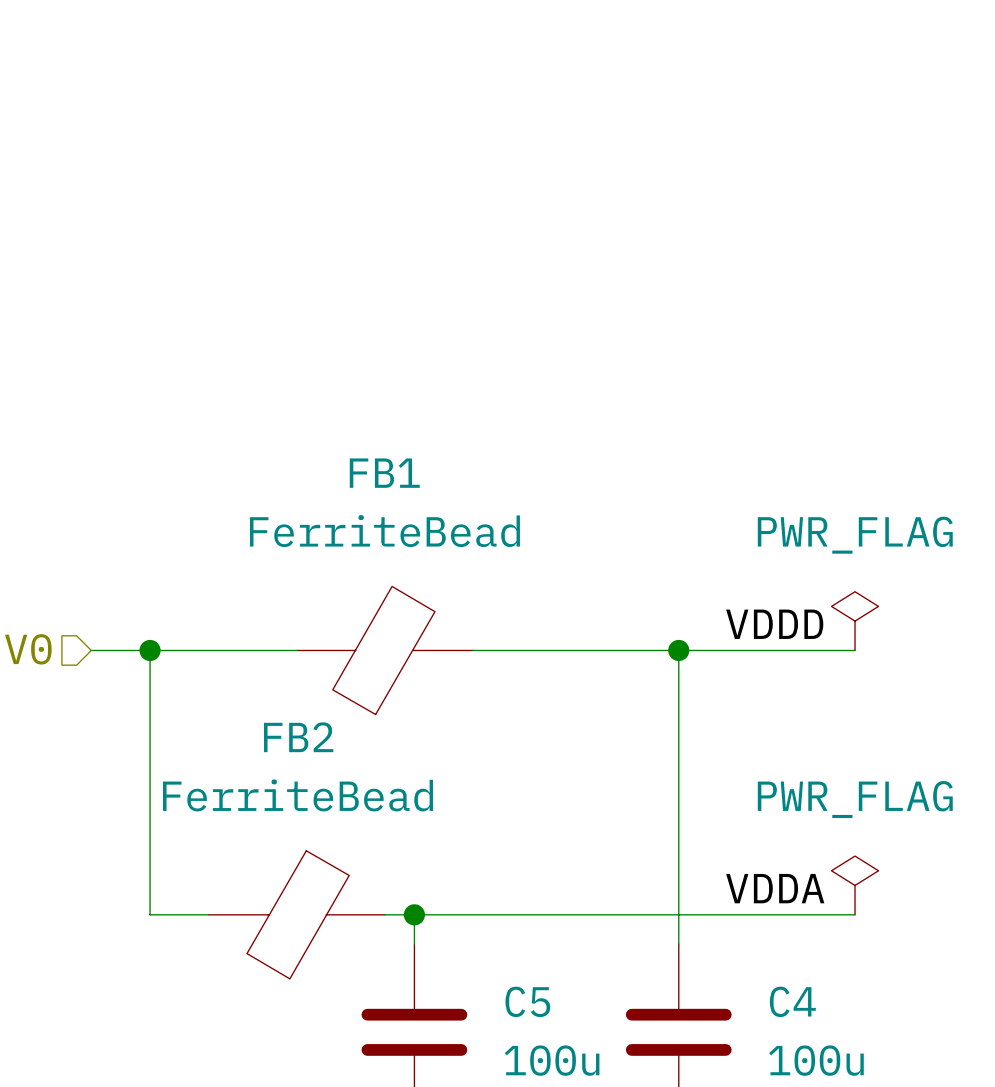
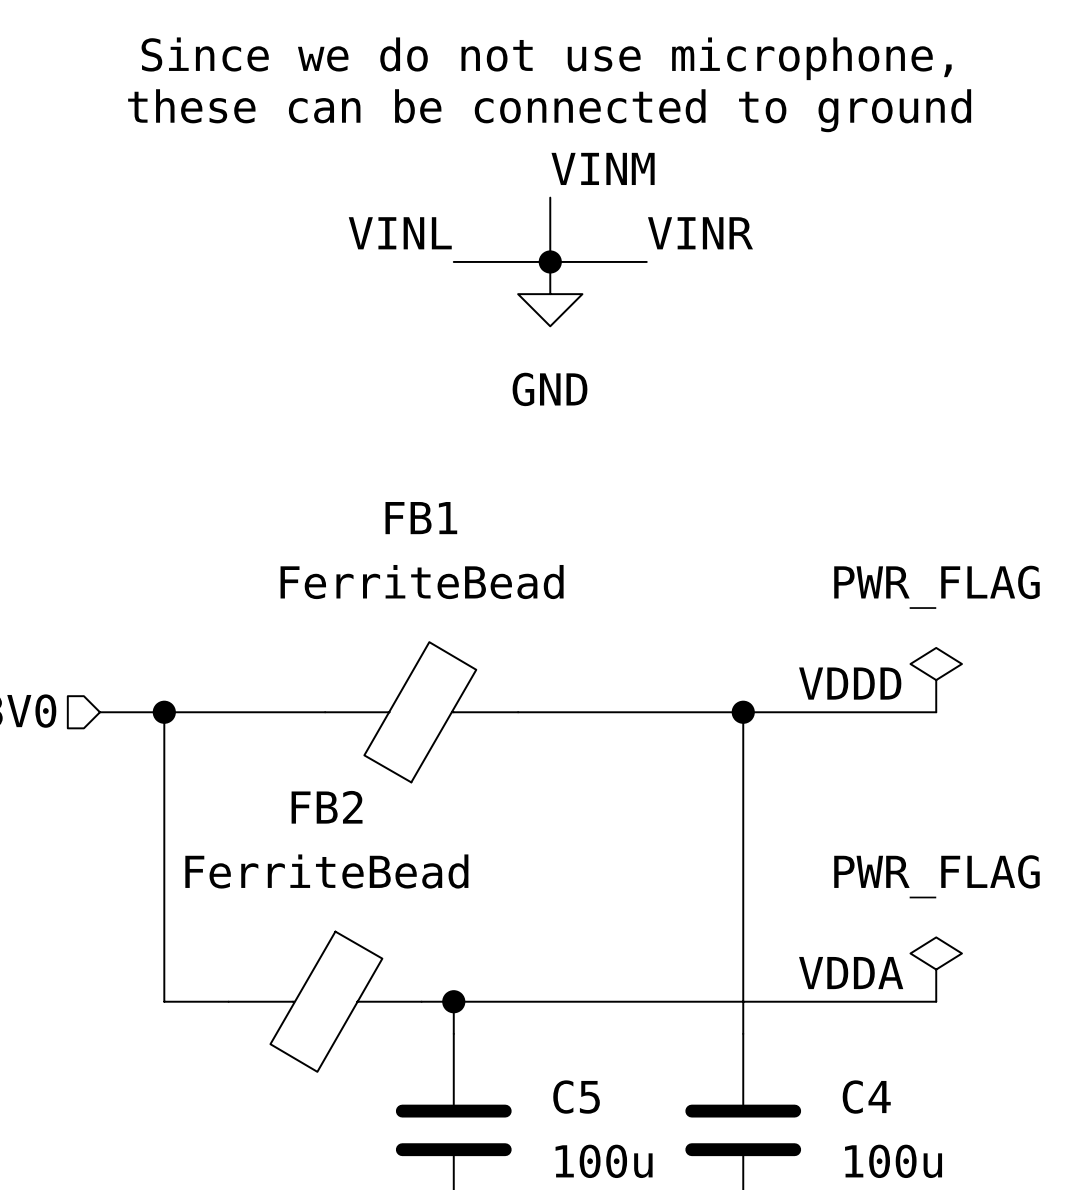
text: none -> Since we do not use microphone, (546, 58)
text: none -> these can be connected to ground (549, 110)
label: none -> VINM (603, 168)
wire: none -> (550, 197) (550, 261)
label: none -> VINL (400, 233)
label: none -> VINR (700, 233)
wire: none -> (453, 261) (646, 261)
junction: none -> (550, 261)
power symbol: none -> GND (550, 294)

